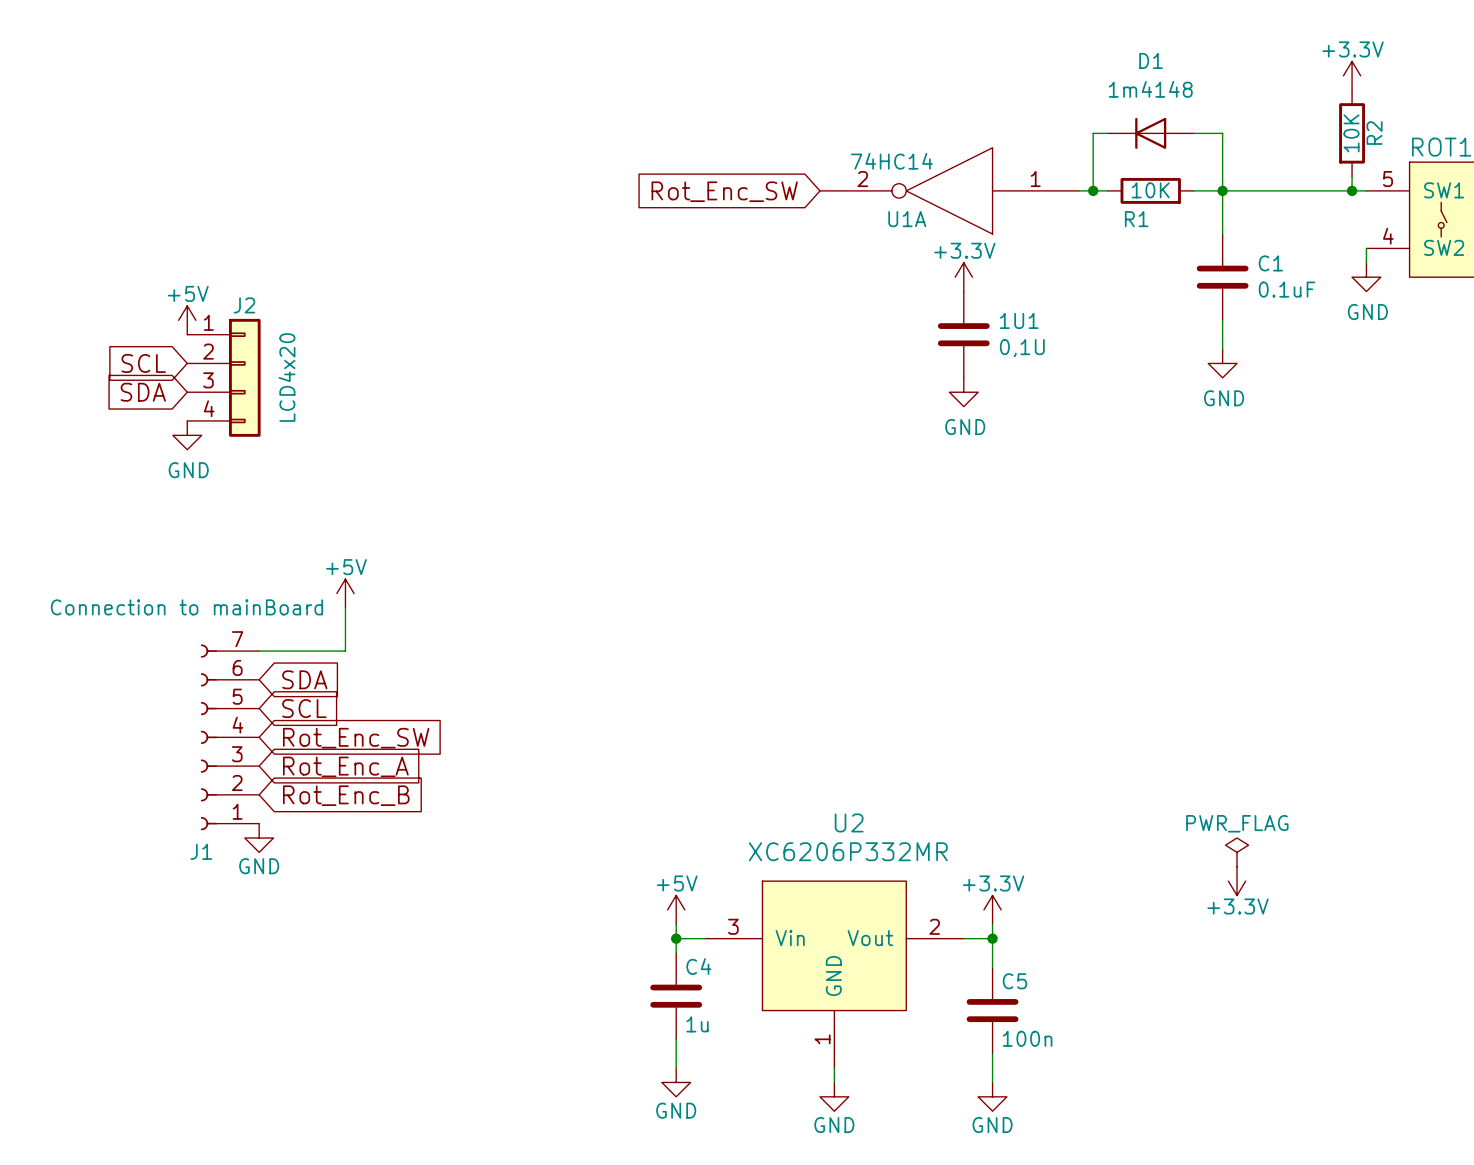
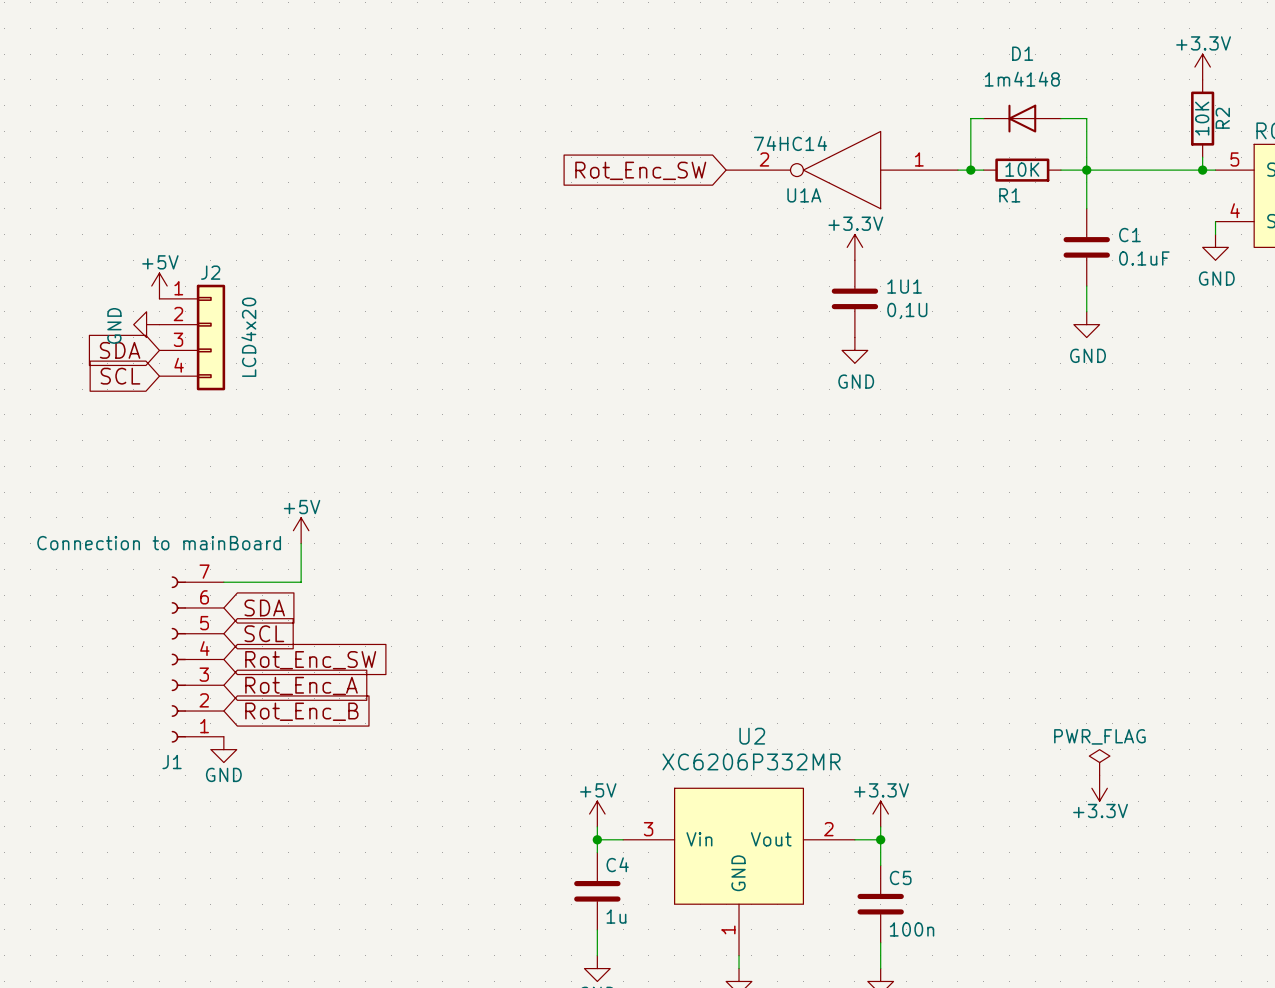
global label position: SCL (143, 363) -> SCL (120, 376)
power symbol rotation: 0° (187, 435) -> 90° clockwise (146, 324)
power symbol position: GND (187, 435) -> GND (146, 324)

